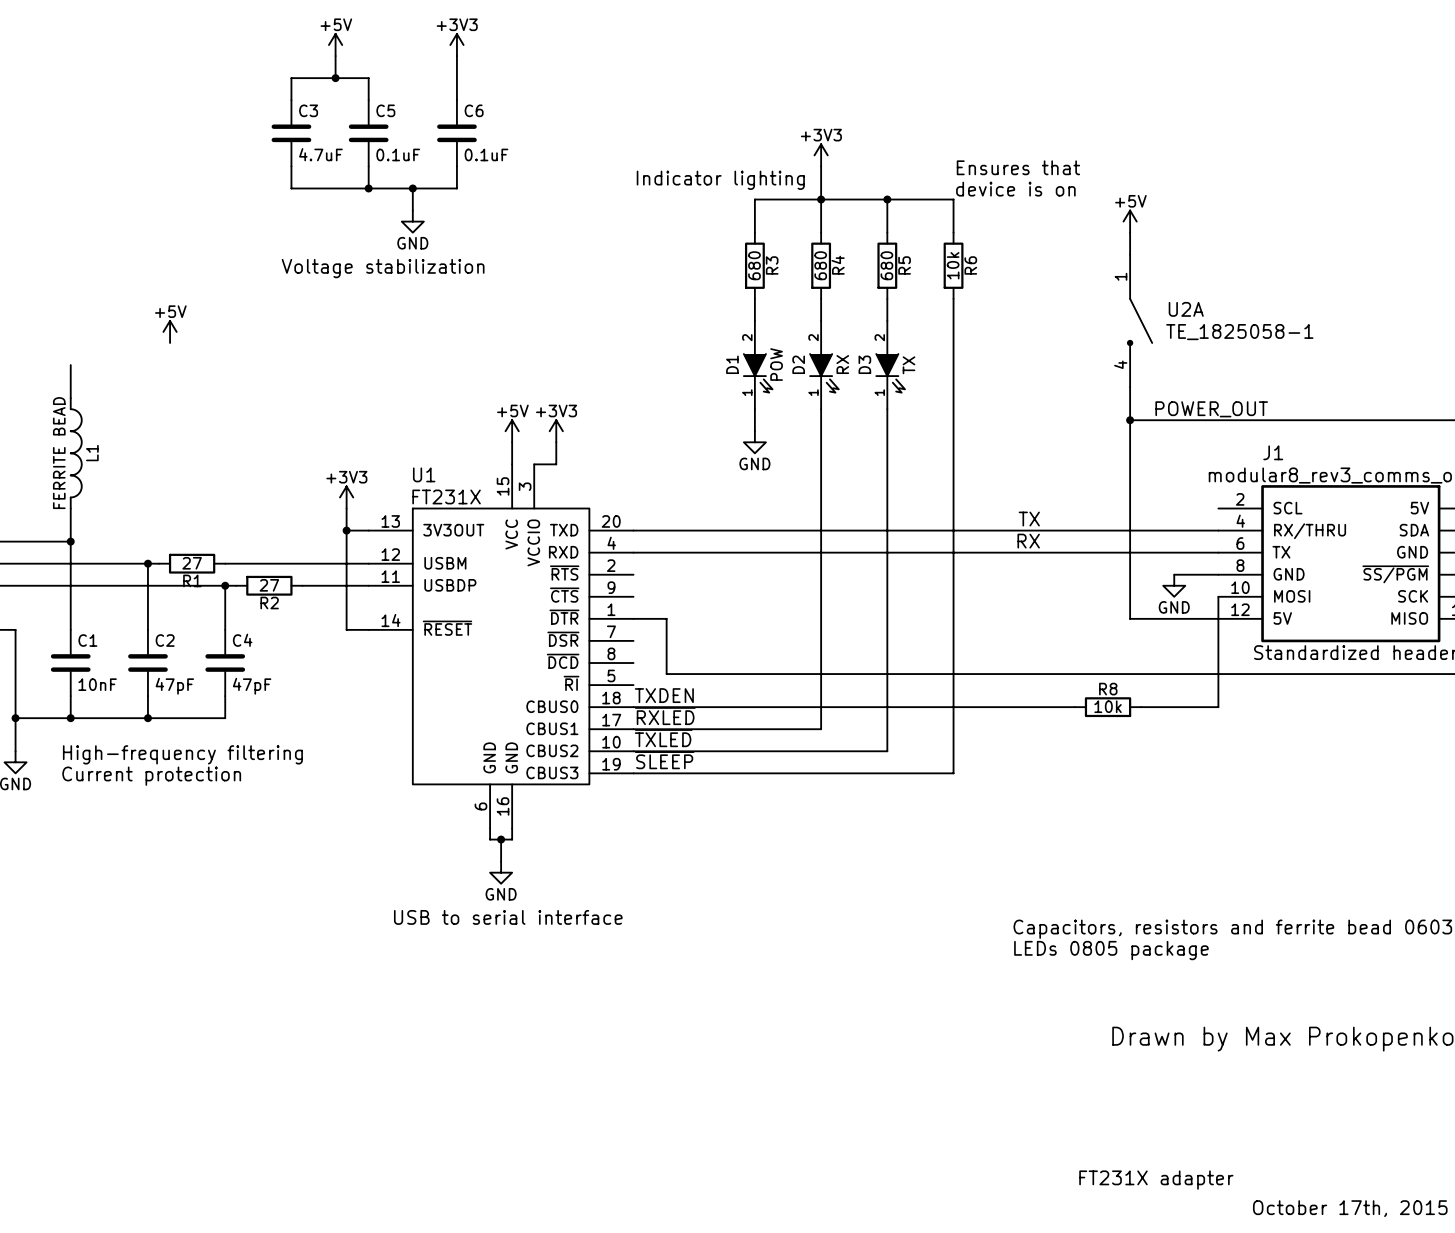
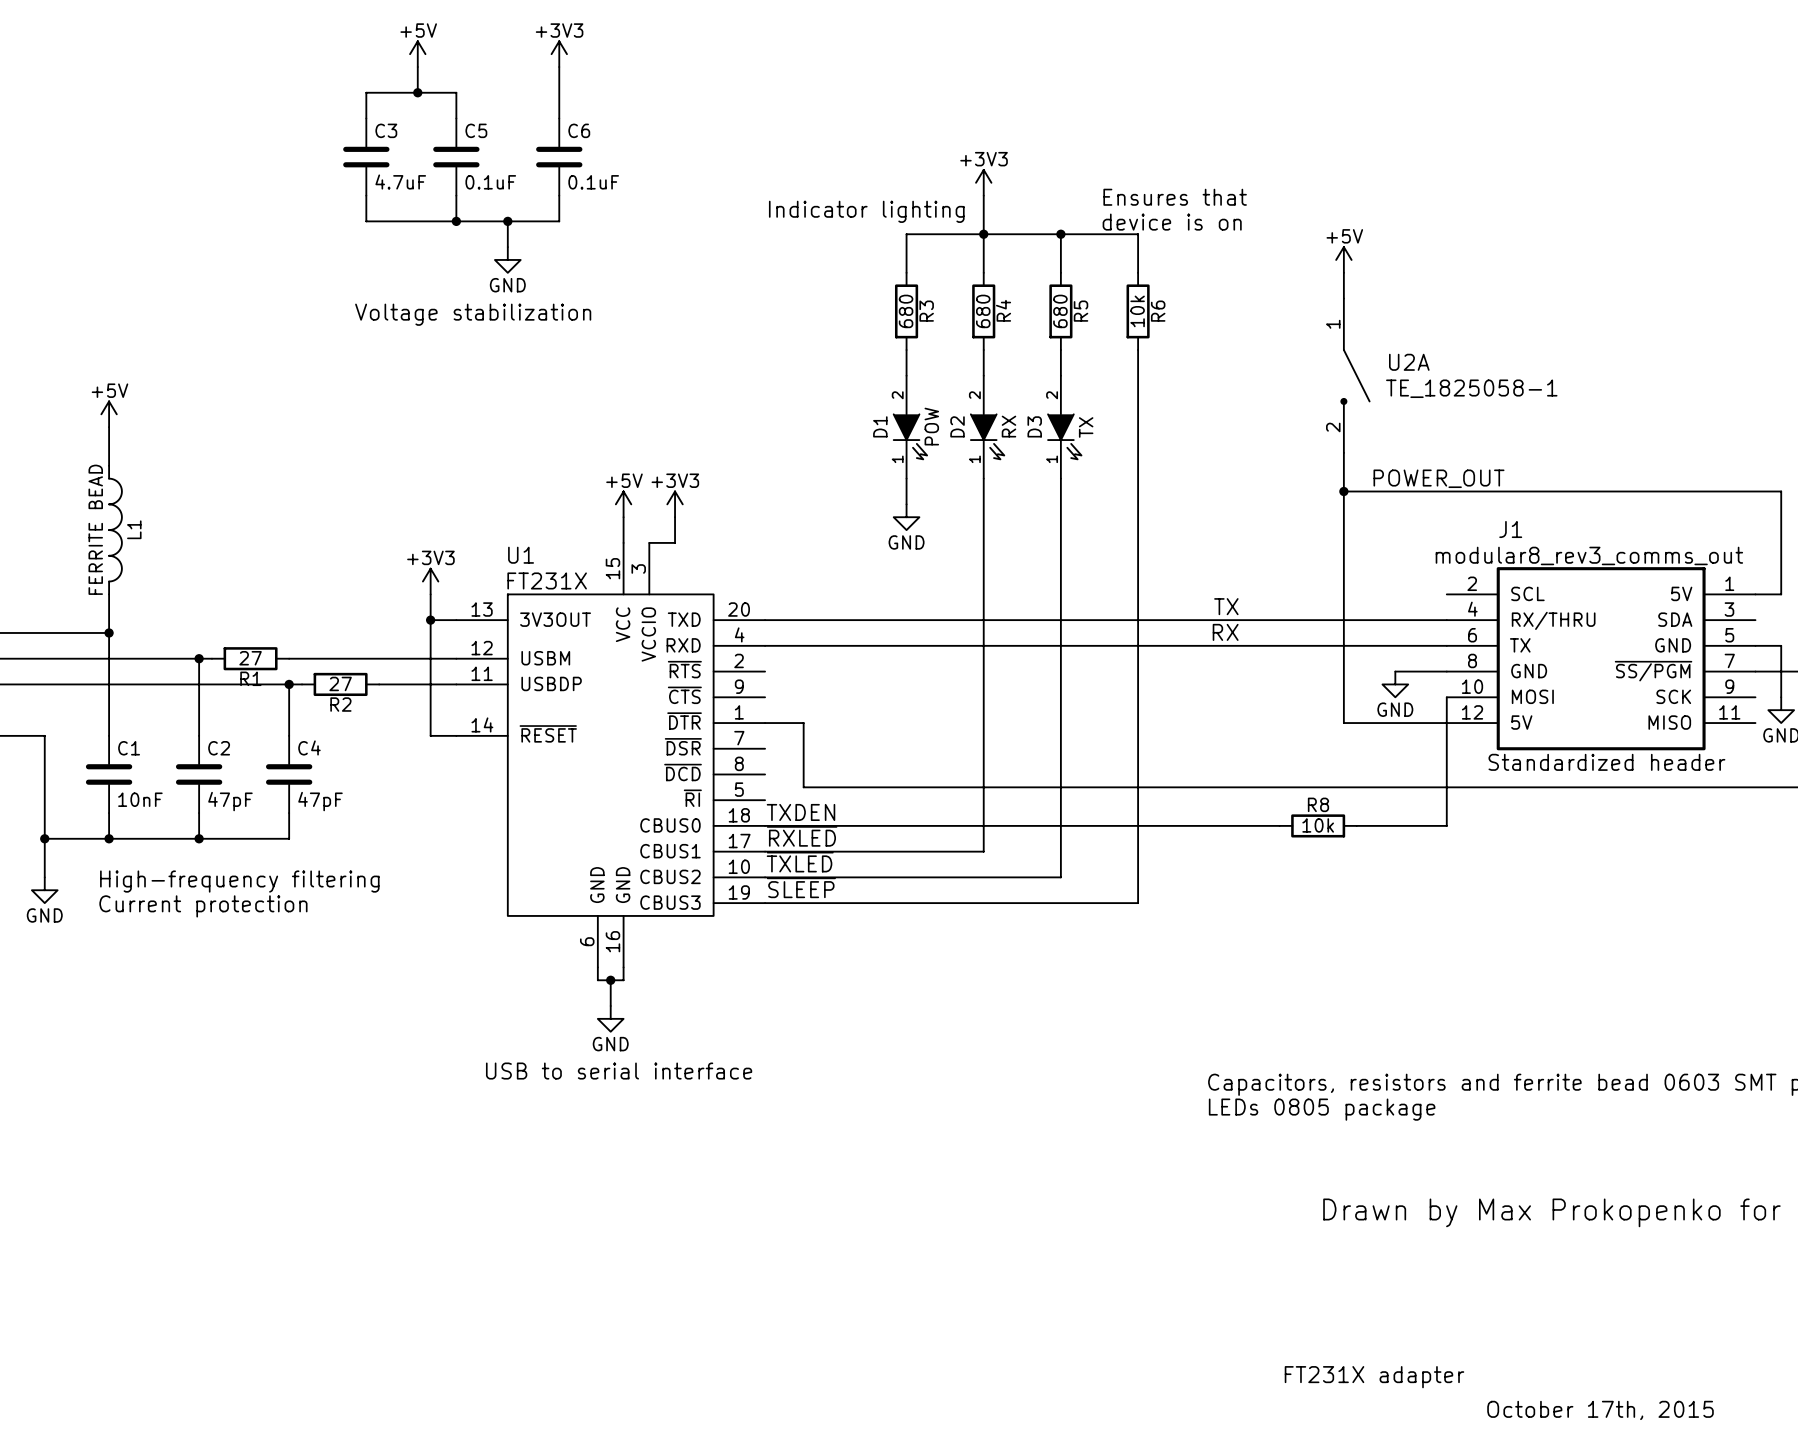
text position: Ensures that (1018, 167) -> Ensures that (1175, 197)
text position: device is on (1015, 189) -> device is on (1172, 222)
power symbol position: +5V (170, 331) -> +5V (109, 414)
U2A pin number: 4 (1120, 364) -> 2 (1333, 427)

